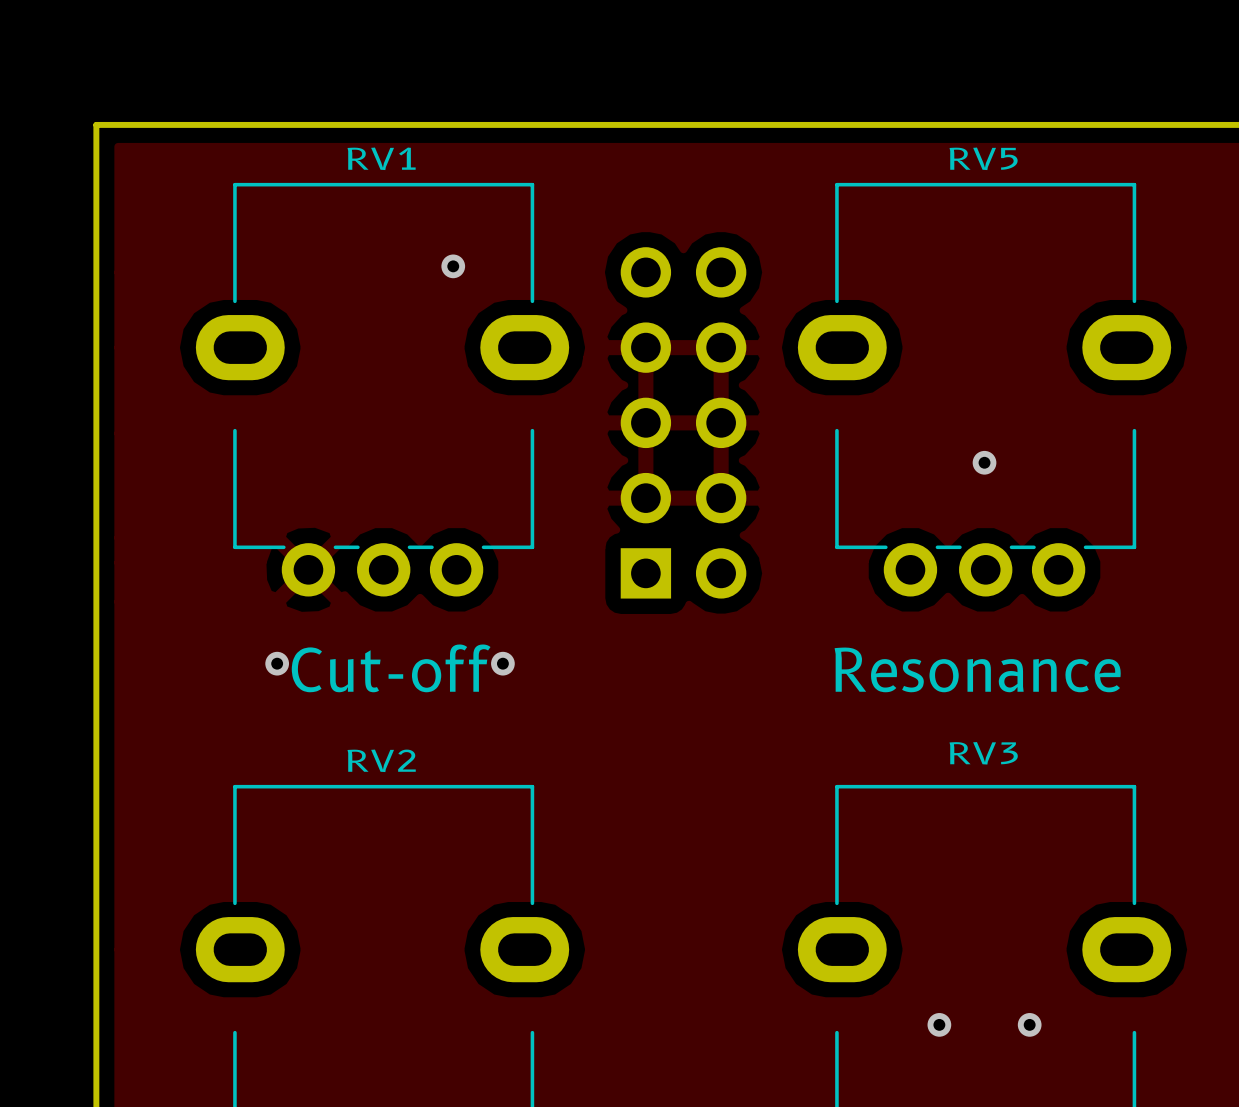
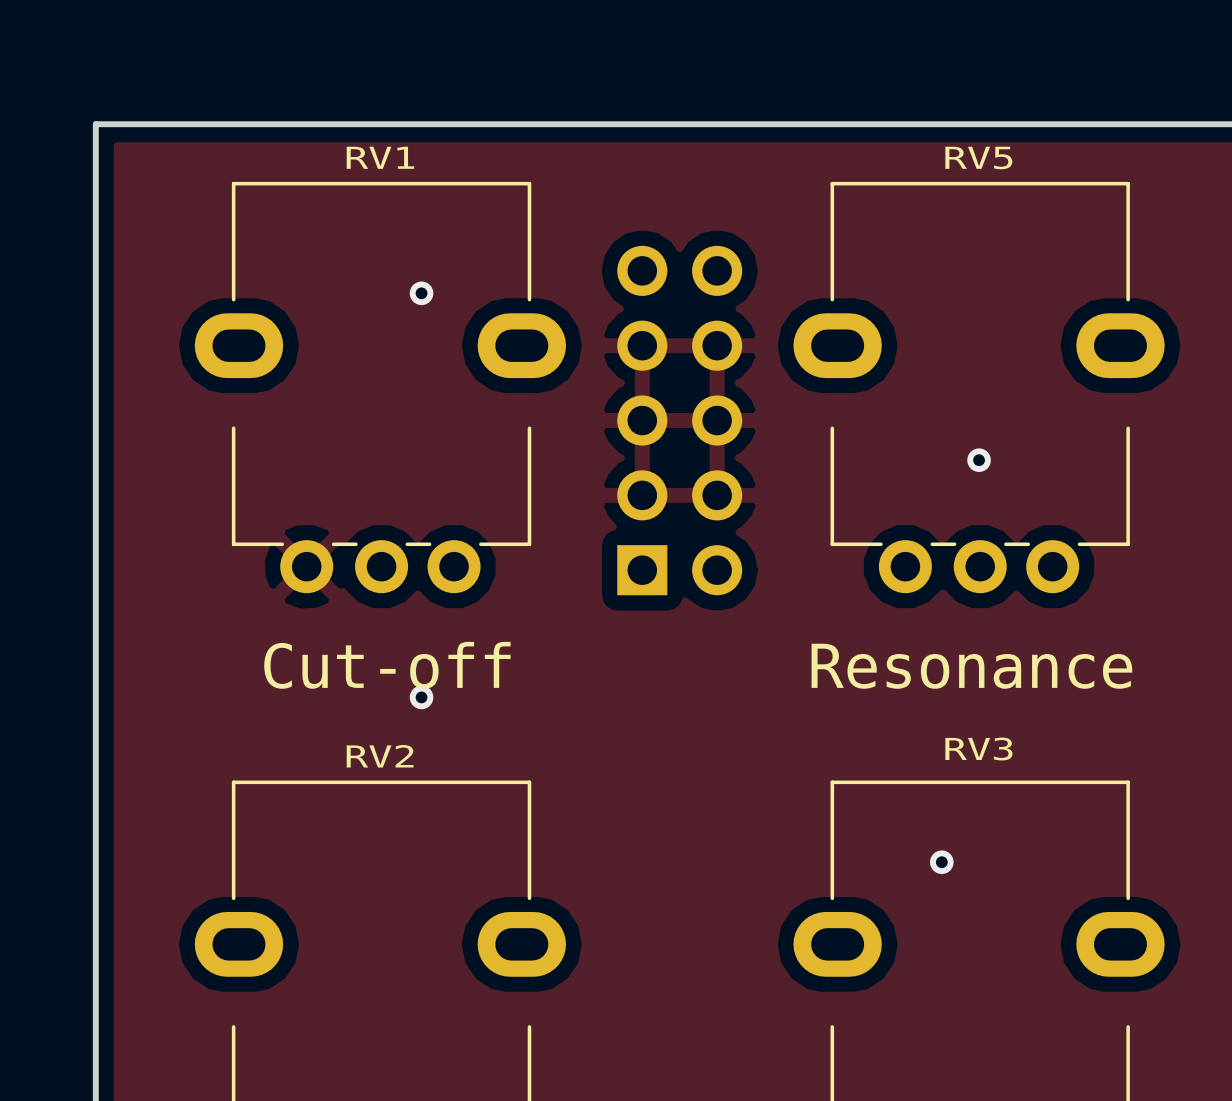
via position: (453, 266) -> (421, 293)
via: (277, 663) -> none
via: (502, 663) -> none
via: none -> (421, 697)
via: none -> (941, 862)
via: (939, 1024) -> none
via: (1029, 1024) -> none

